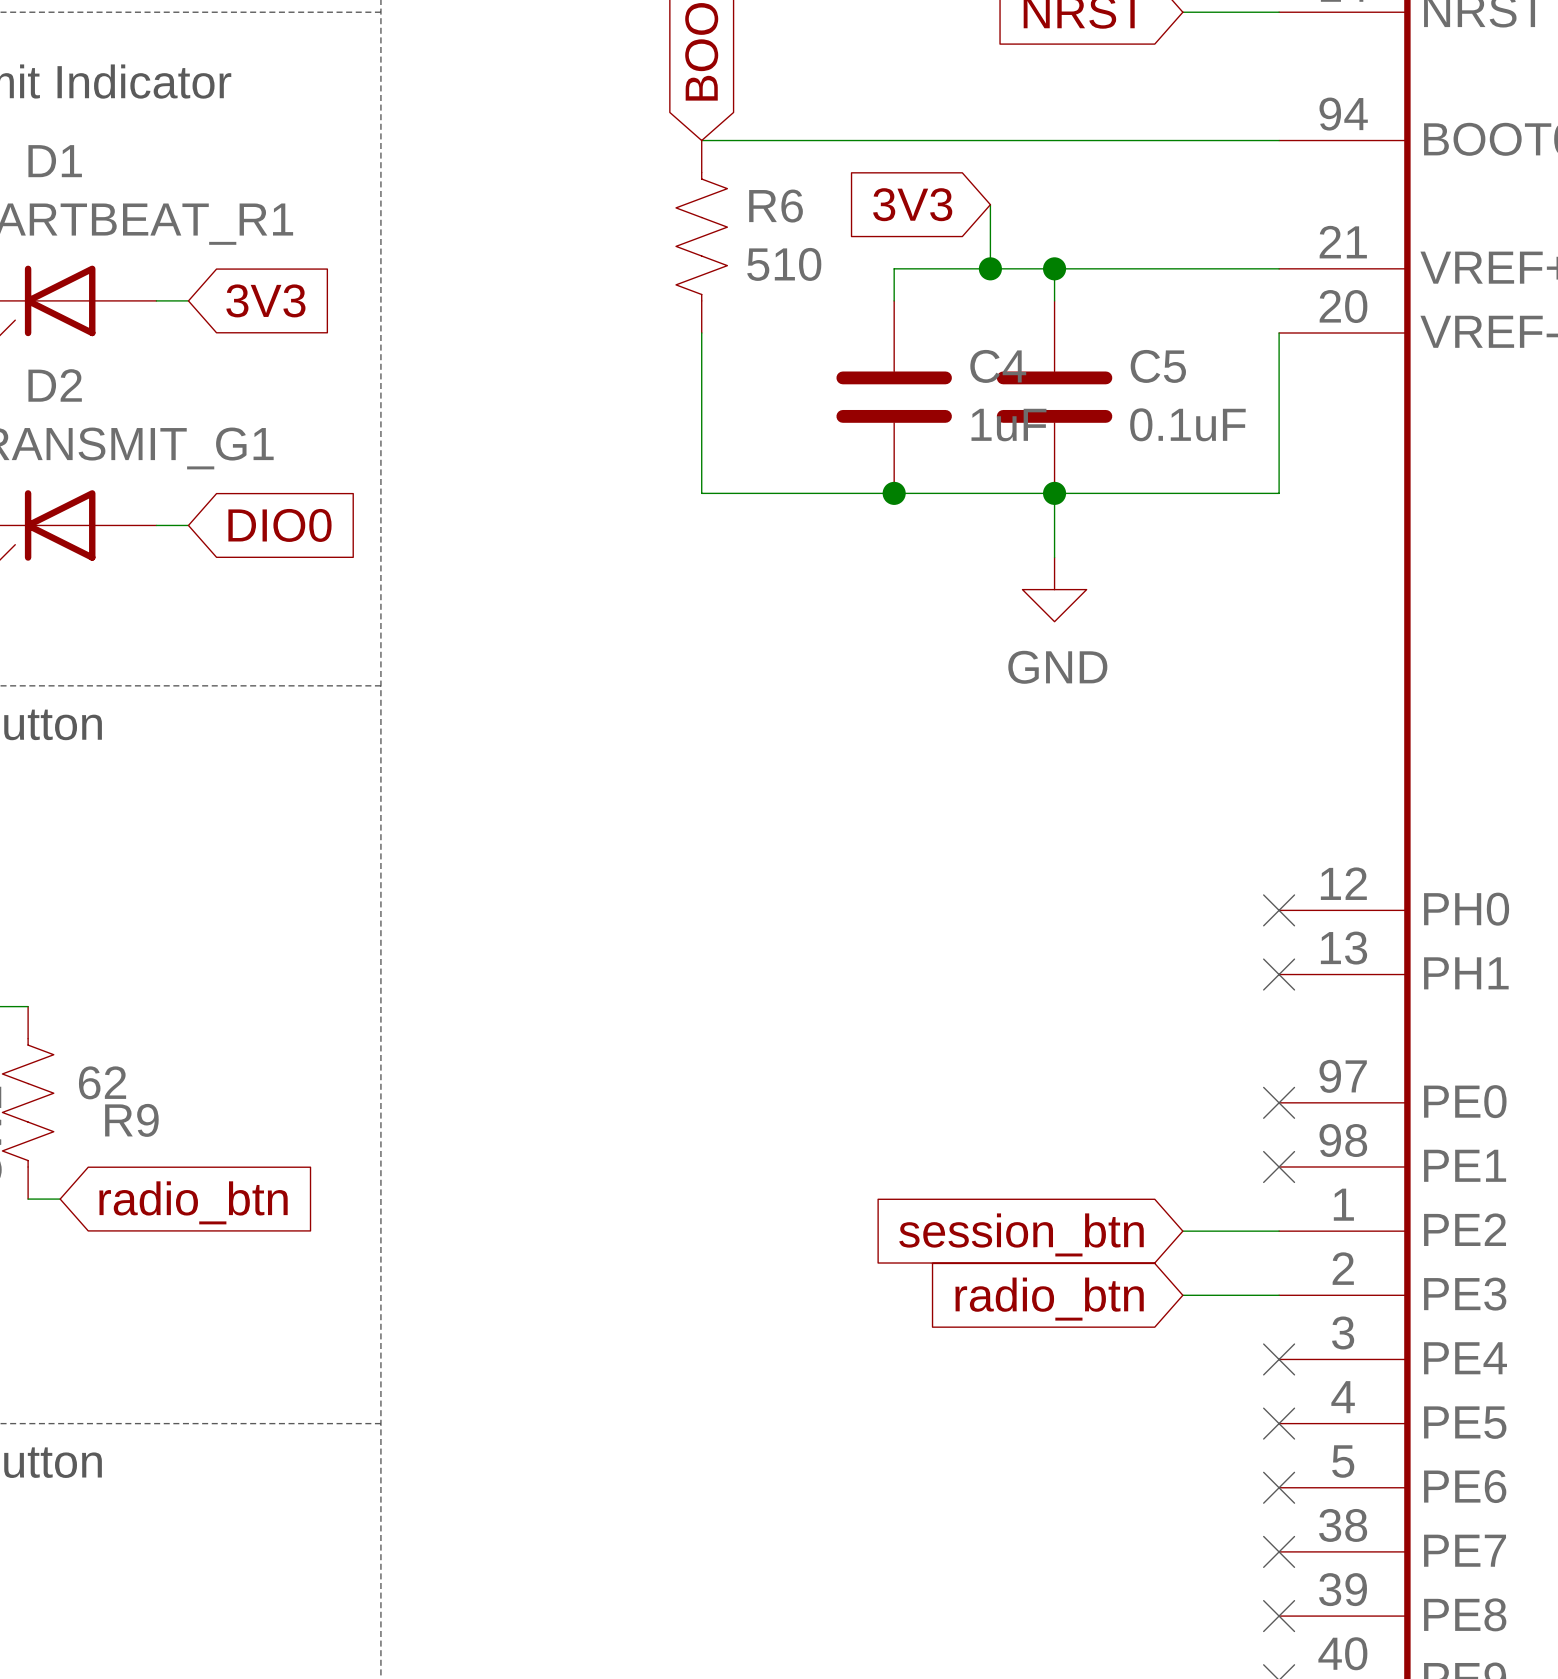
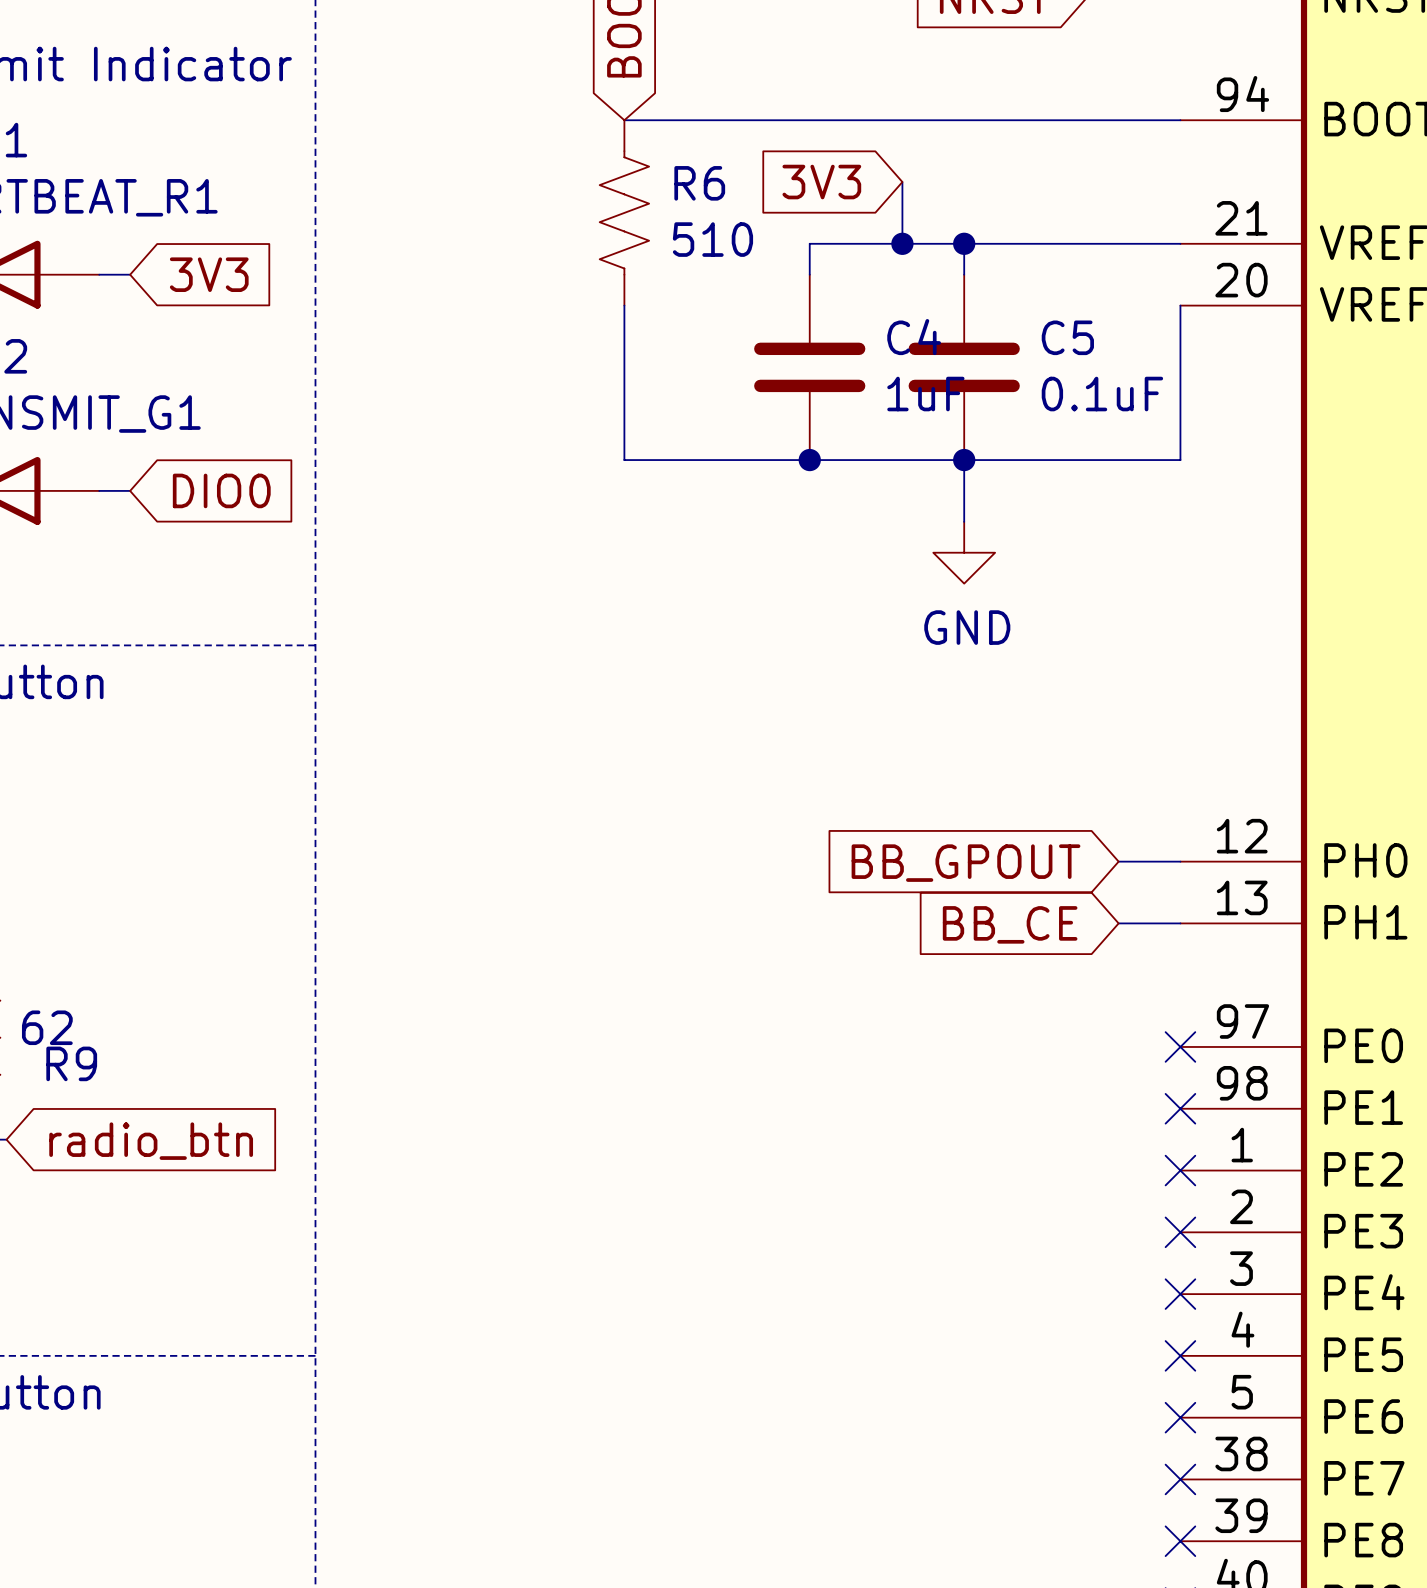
wire: none -> (1118, 861) (1180, 861)
no-connect mark: (1279, 910) -> none
global label: none -> BB_GPOUT (965, 863)
wire: none -> (1118, 923) (1180, 923)
no-connect mark: (1279, 974) -> none
global label: none -> BB_CE (1010, 924)
wire: (1182, 1231) (1279, 1231) -> none
no-connect mark: none -> (1180, 1170)
global label: session_btn (1021, 1234) -> none
wire: (1182, 1295) (1279, 1295) -> none
no-connect mark: none -> (1180, 1232)
global label: radio_btn (1049, 1299) -> none

